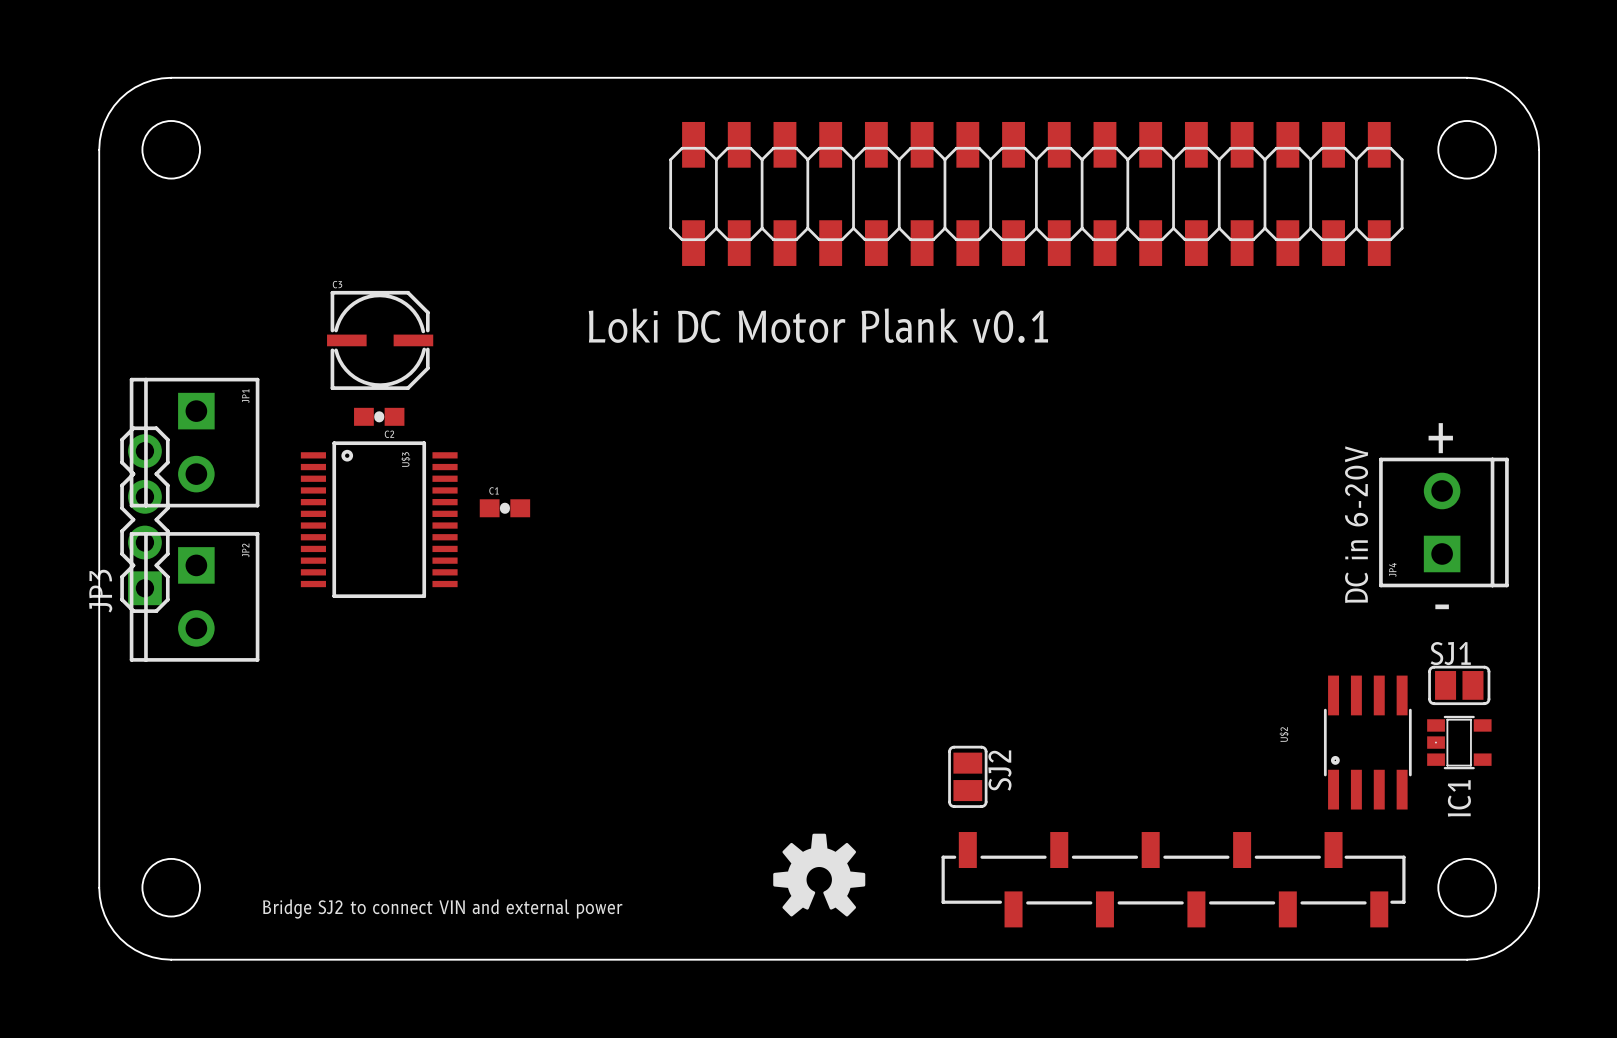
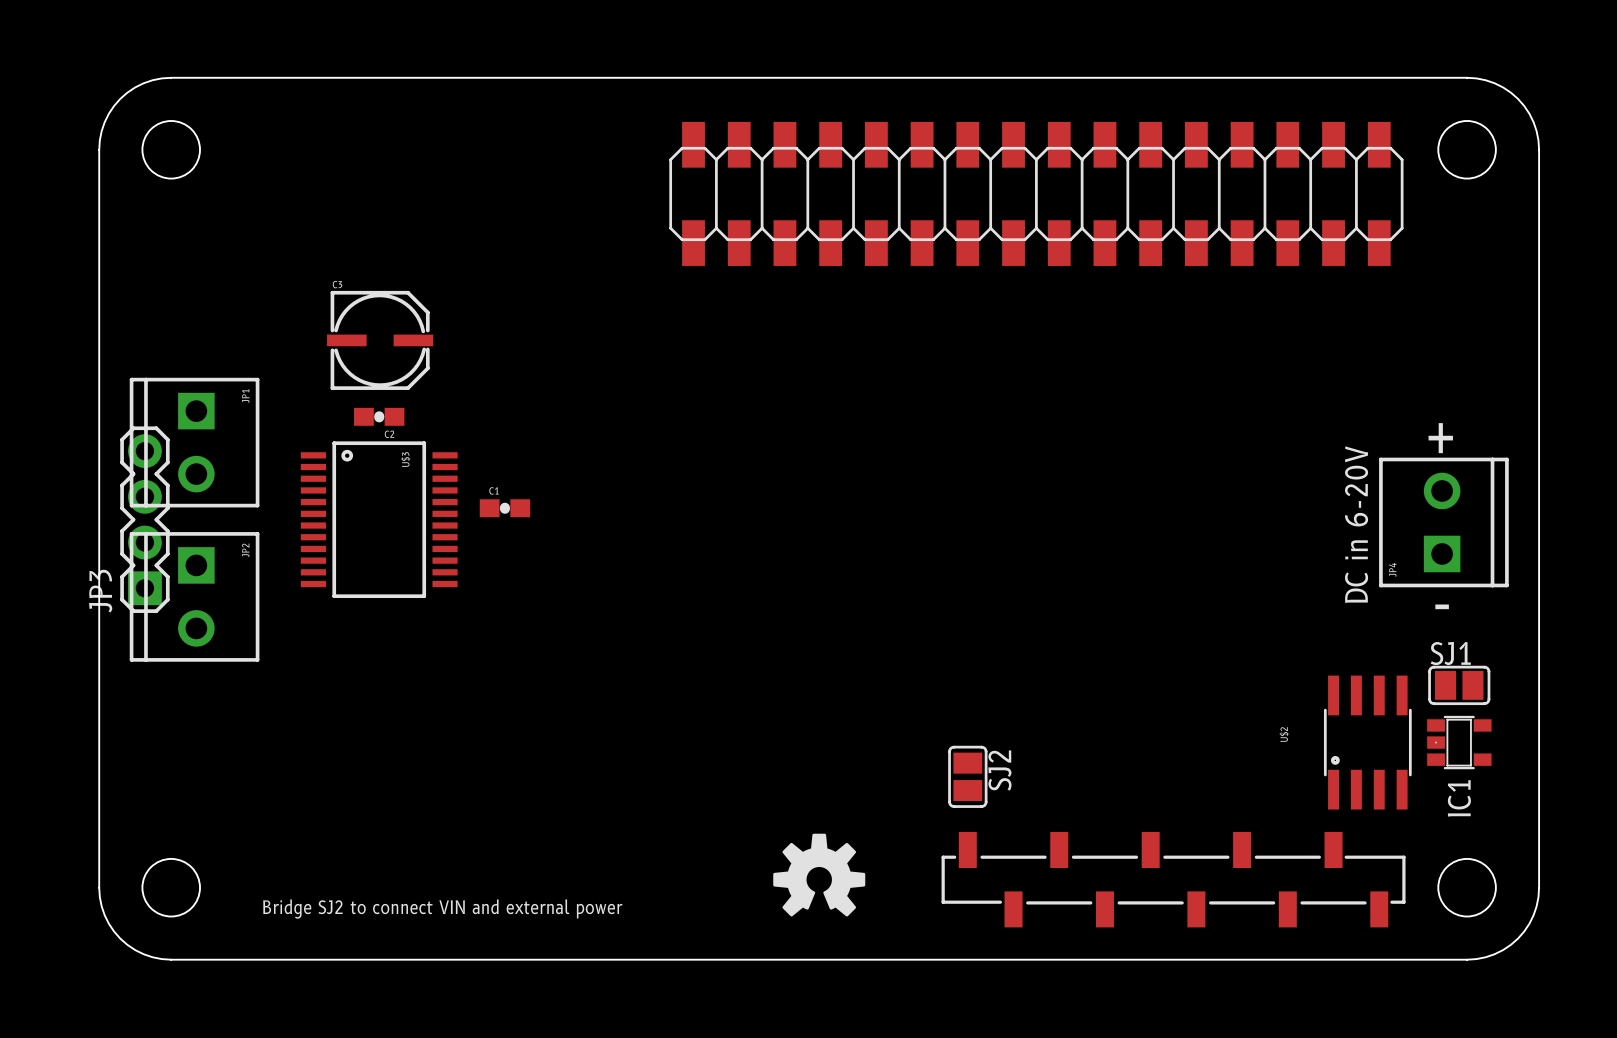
text: Loki DC Motor Plank v0.1 (818, 325) -> none

